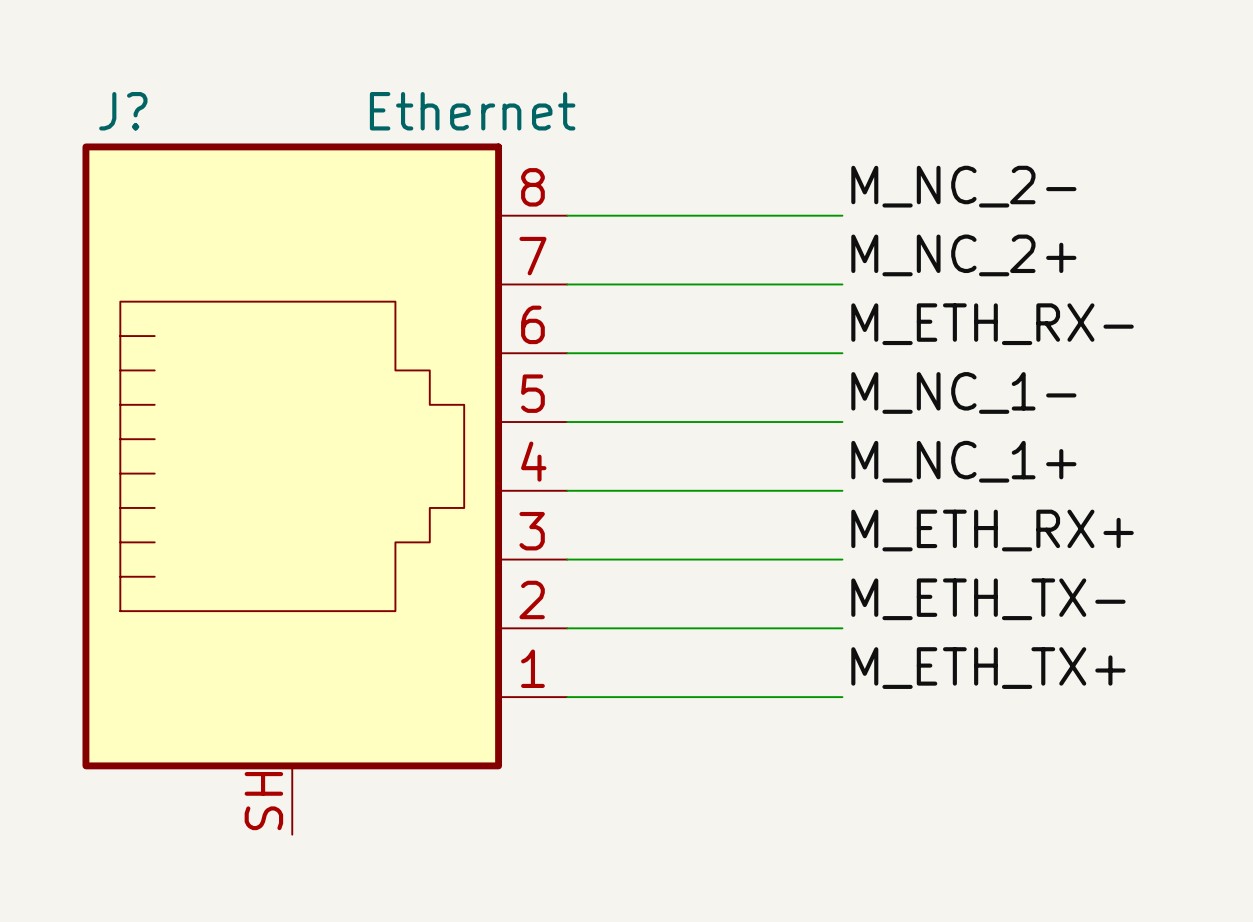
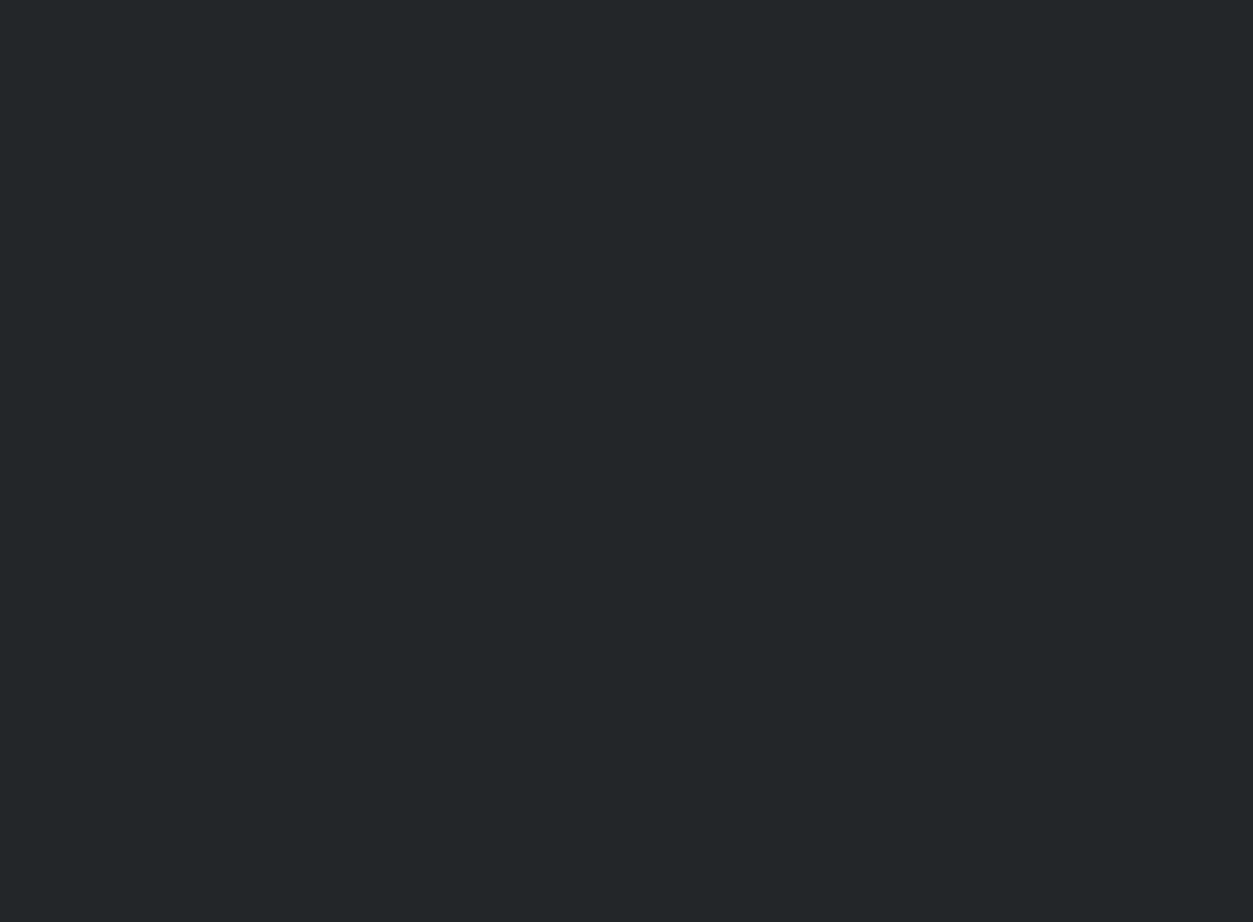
label: M_NC_2- (963, 186) -> none
wire: (567, 215) (842, 215) -> none
label: M_NC_2+ (963, 255) -> none
wire: (567, 284) (842, 284) -> none
label: M_ETH_RX- (992, 324) -> none
wire: (567, 353) (842, 353) -> none
label: M_NC_1- (963, 392) -> none
wire: (567, 422) (842, 422) -> none
label: M_NC_1+ (963, 461) -> none
J?: Ethernet (324, 489) -> none
wire: (567, 490) (842, 490) -> none
label: M_ETH_RX+ (992, 530) -> none
wire: (567, 559) (842, 559) -> none
label: M_ETH_TX- (988, 599) -> none
wire: (567, 628) (842, 628) -> none
label: M_ETH_TX+ (988, 668) -> none
wire: (567, 697) (842, 697) -> none

